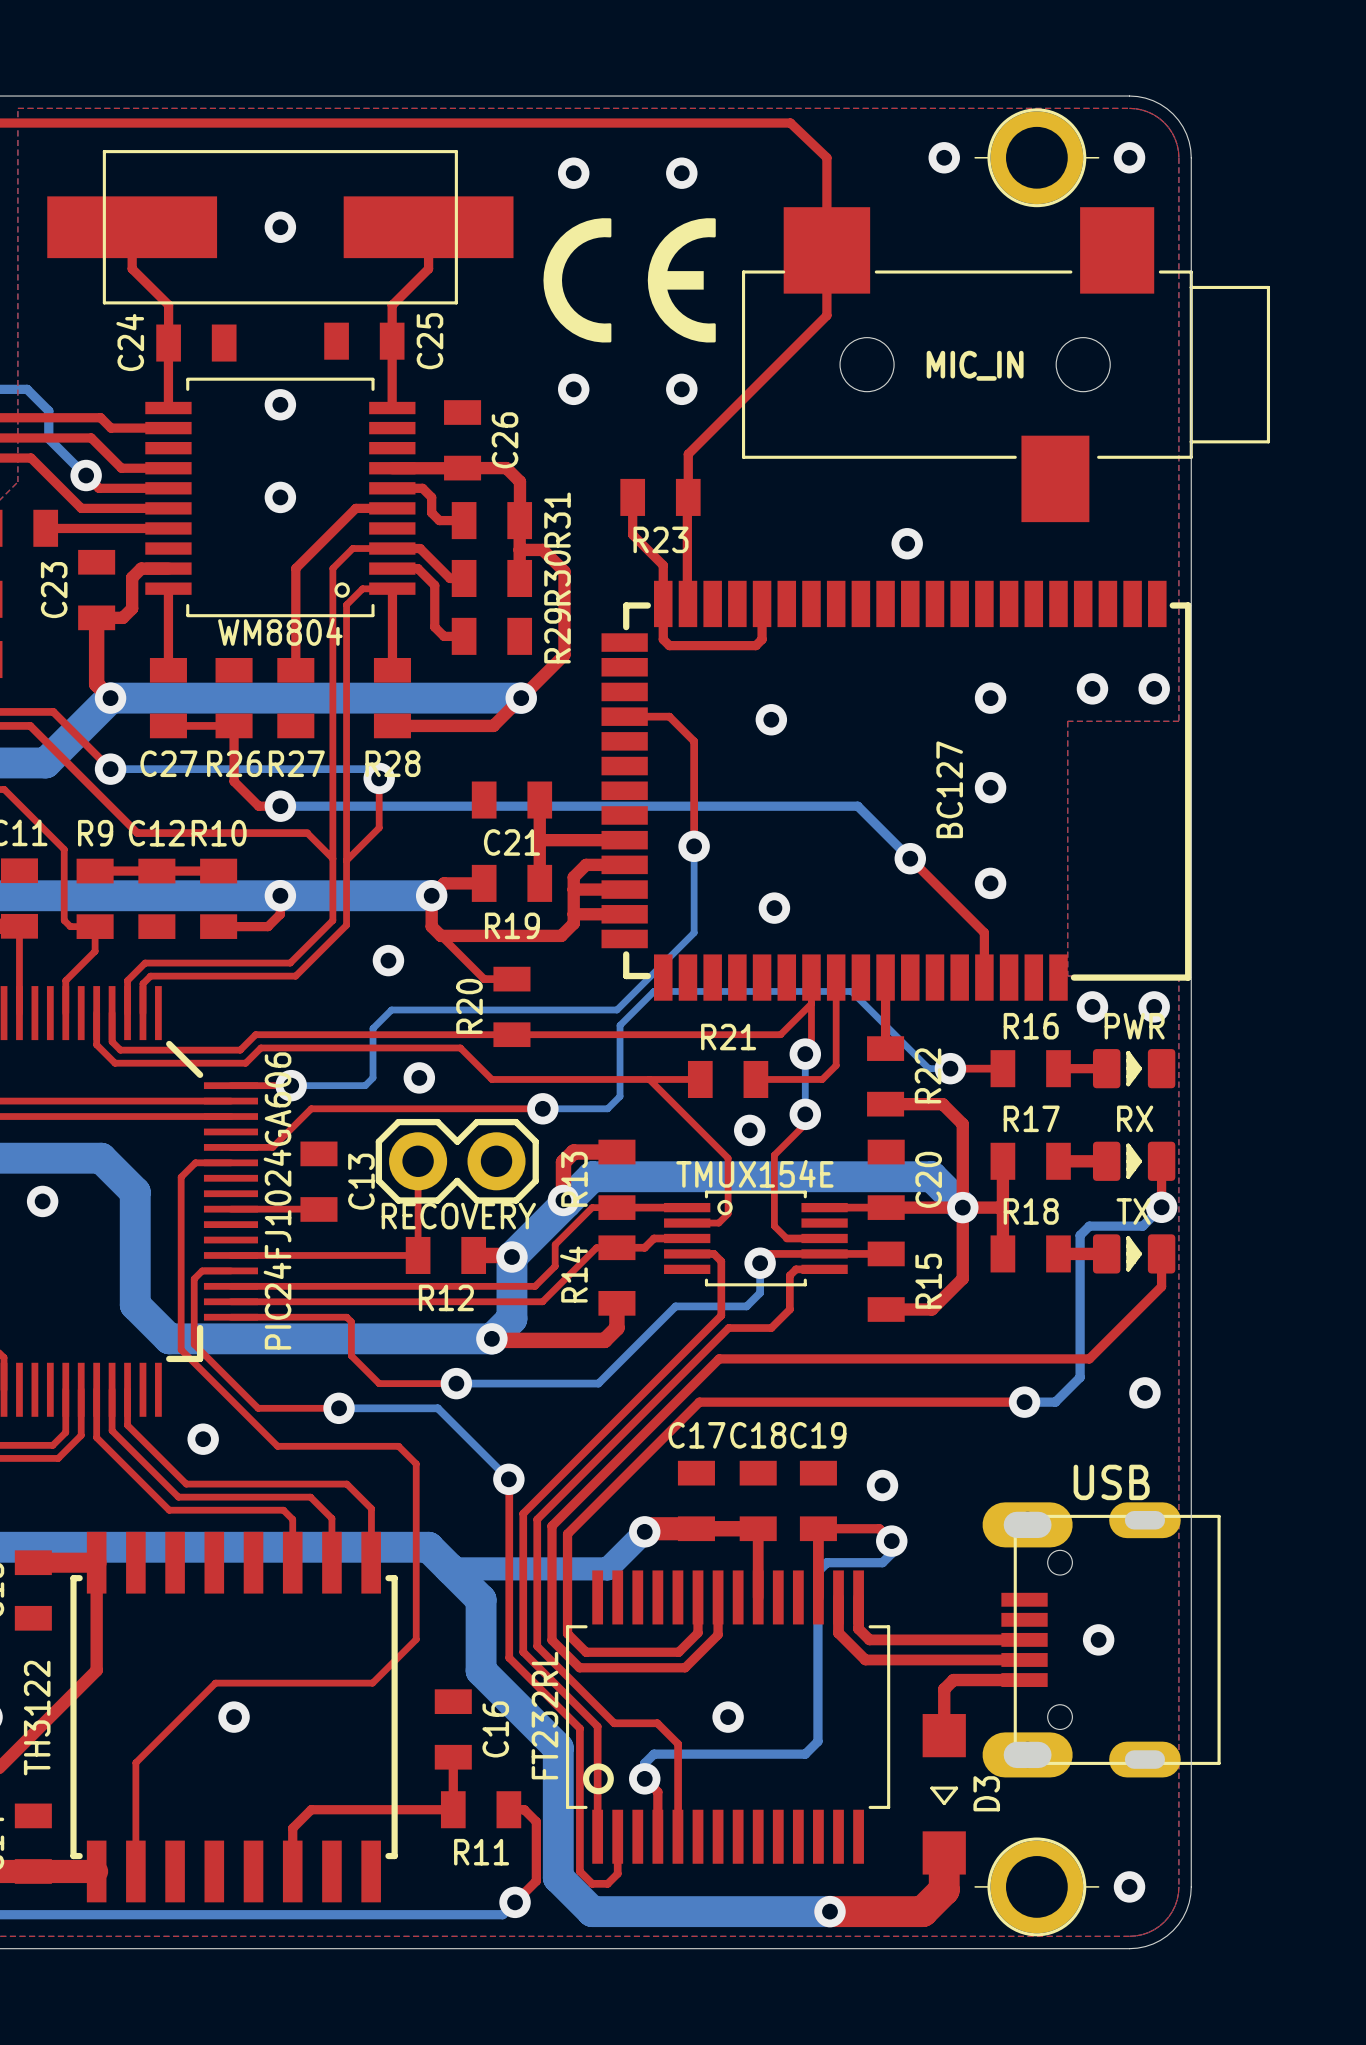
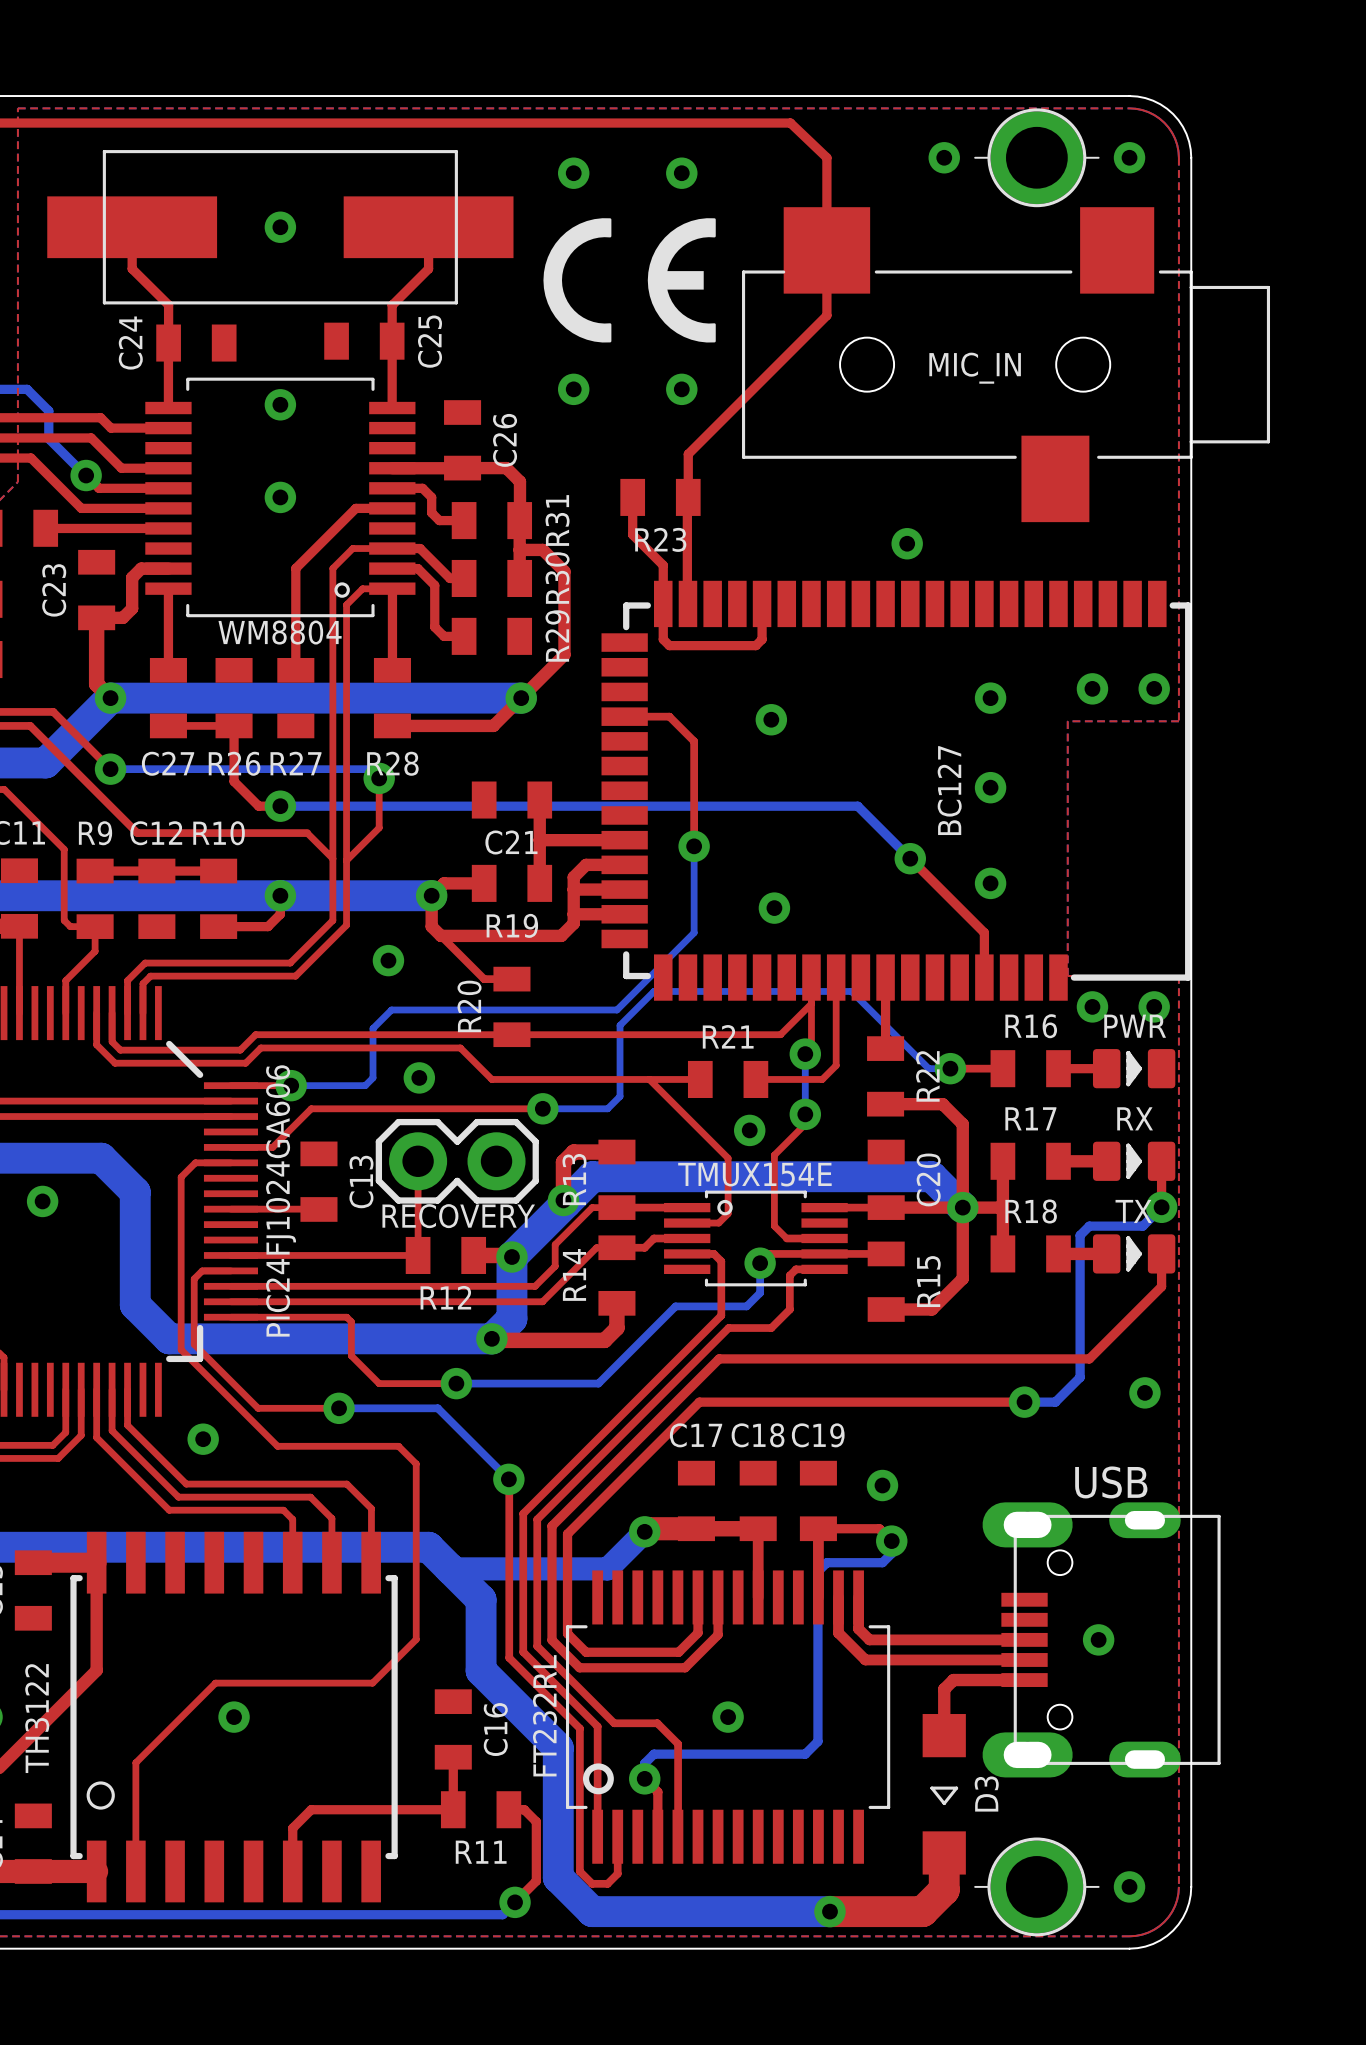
TH3122 footprint: [70, 1531, 398, 1903] -> [70, 1531, 398, 1903]

